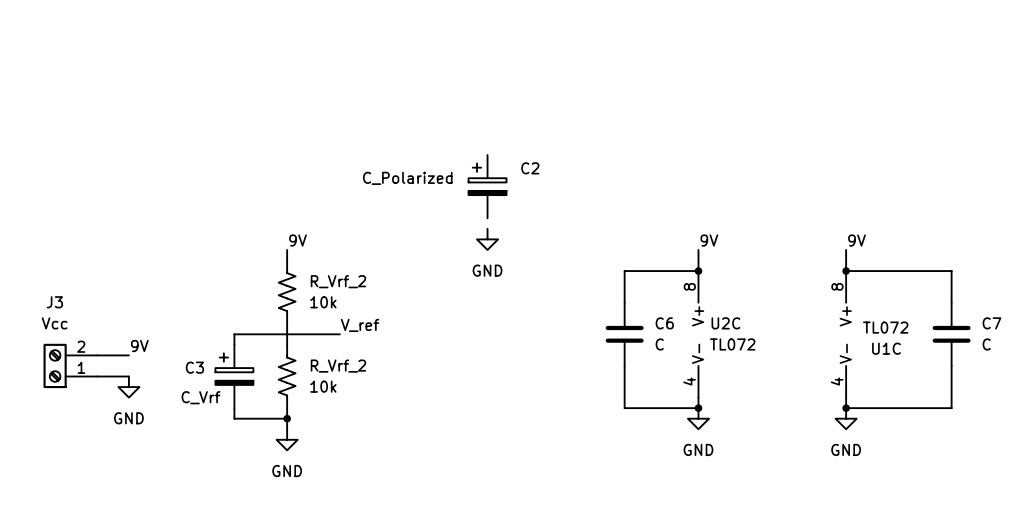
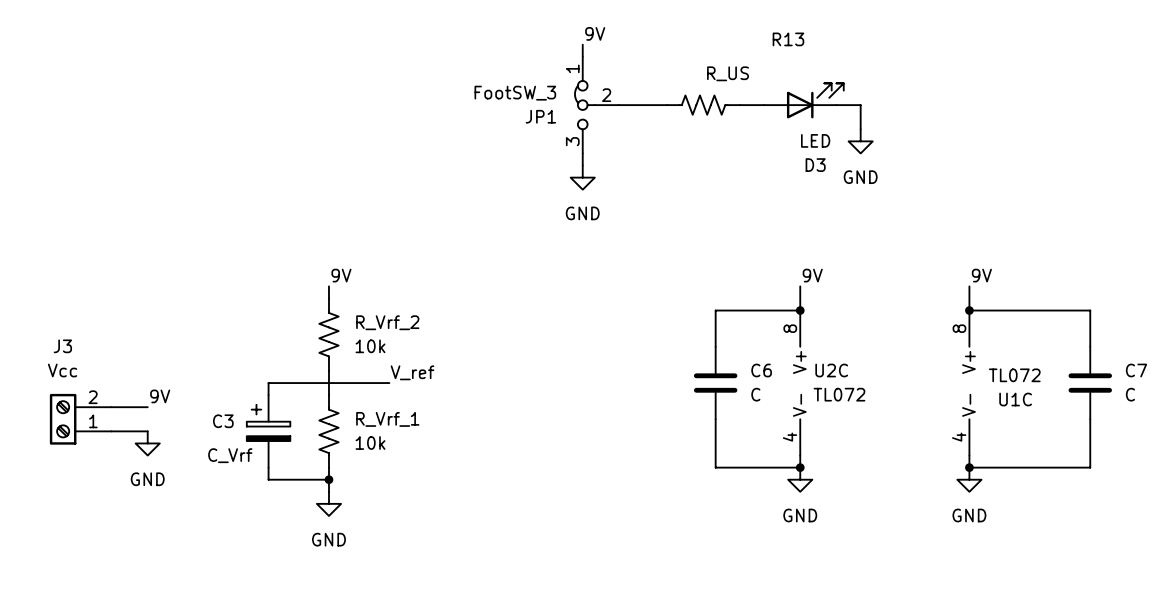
label: none -> 9V (595, 33)
wire: none -> (582, 44) (582, 56)
D3: none -> LED (803, 100)
JP1: none -> FootSW_3 (596, 105)
wire: none -> (618, 105) (667, 105)
R13: none -> R_US (703, 105)
wire: none -> (739, 105) (764, 105)
wire: none -> (836, 105) (860, 105) (860, 129)
power symbol: none -> GND (860, 141)
wire: none -> (582, 153) (582, 165)
C2: C_Polarized (487, 186) -> none
power symbol position: GND (487, 239) -> GND (582, 177)
R_Vrf_2 name: R_Vrf_2 (338, 366) -> R_Vrf_1 (387, 419)

